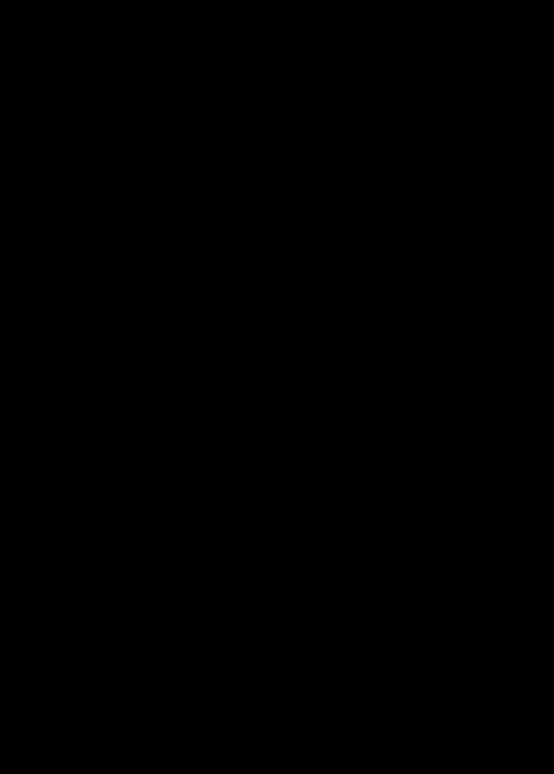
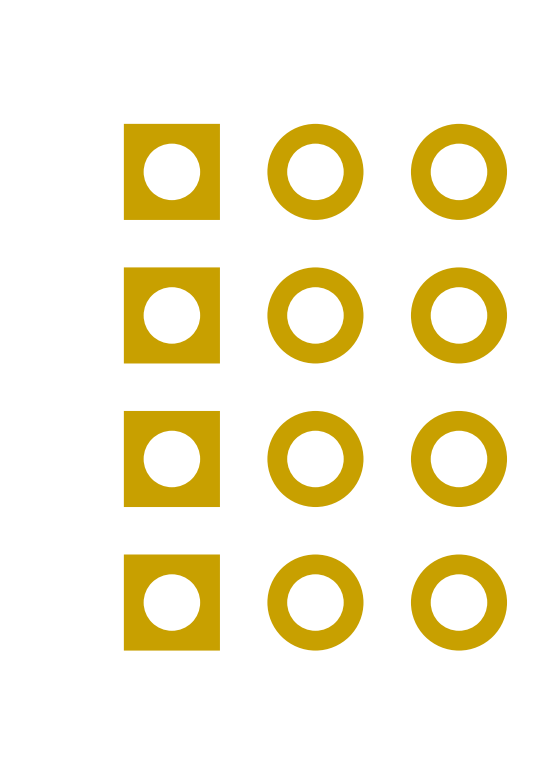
part: none -> (315, 171)
part: none -> (315, 315)
part: none -> (315, 458)
part: none -> (315, 602)

